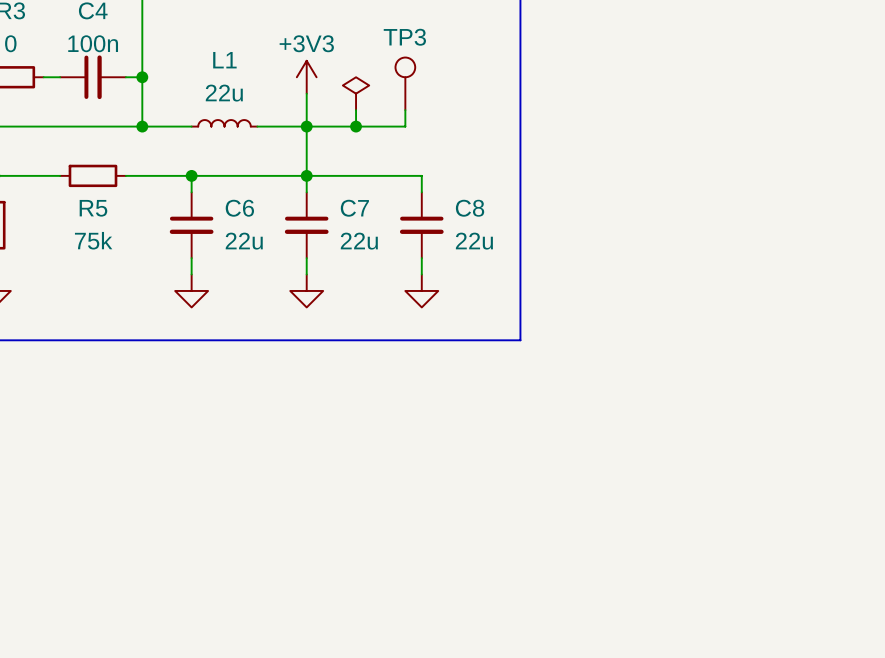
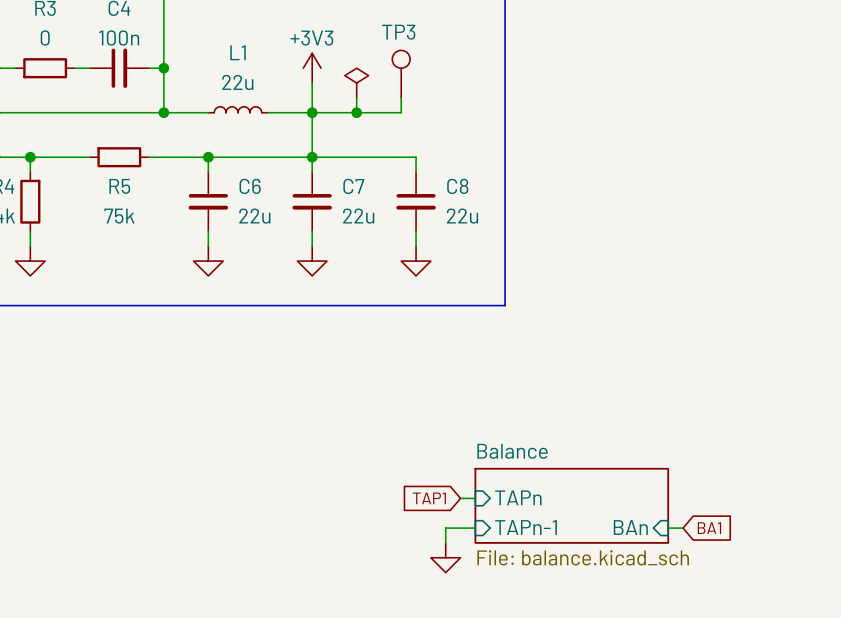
sheet pin: none -> TAPn (518, 497)
global label: none -> TAP1 (429, 498)
wire: none -> (460, 498) (475, 498)
sheet Balance: none -> File: balance.kicad_sch (571, 505)
wire: none -> (475, 528) (445, 528) (445, 542)
sheet pin: none -> TAPn-1 (526, 527)
sheet pin: none -> BAn (630, 527)
wire: none -> (668, 528) (683, 528)
global label: none -> BA1 (709, 528)
power symbol: none -> (445, 557)

